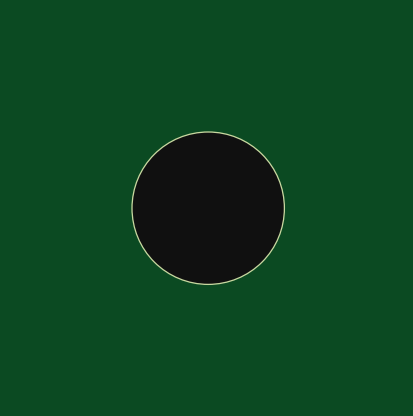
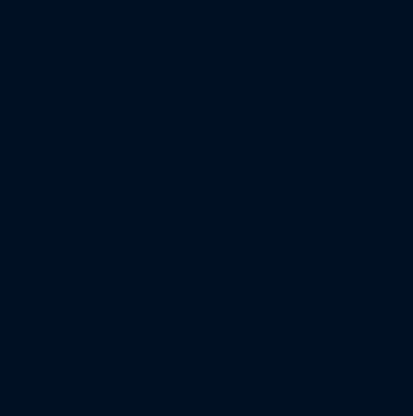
part: (208, 208) -> none

